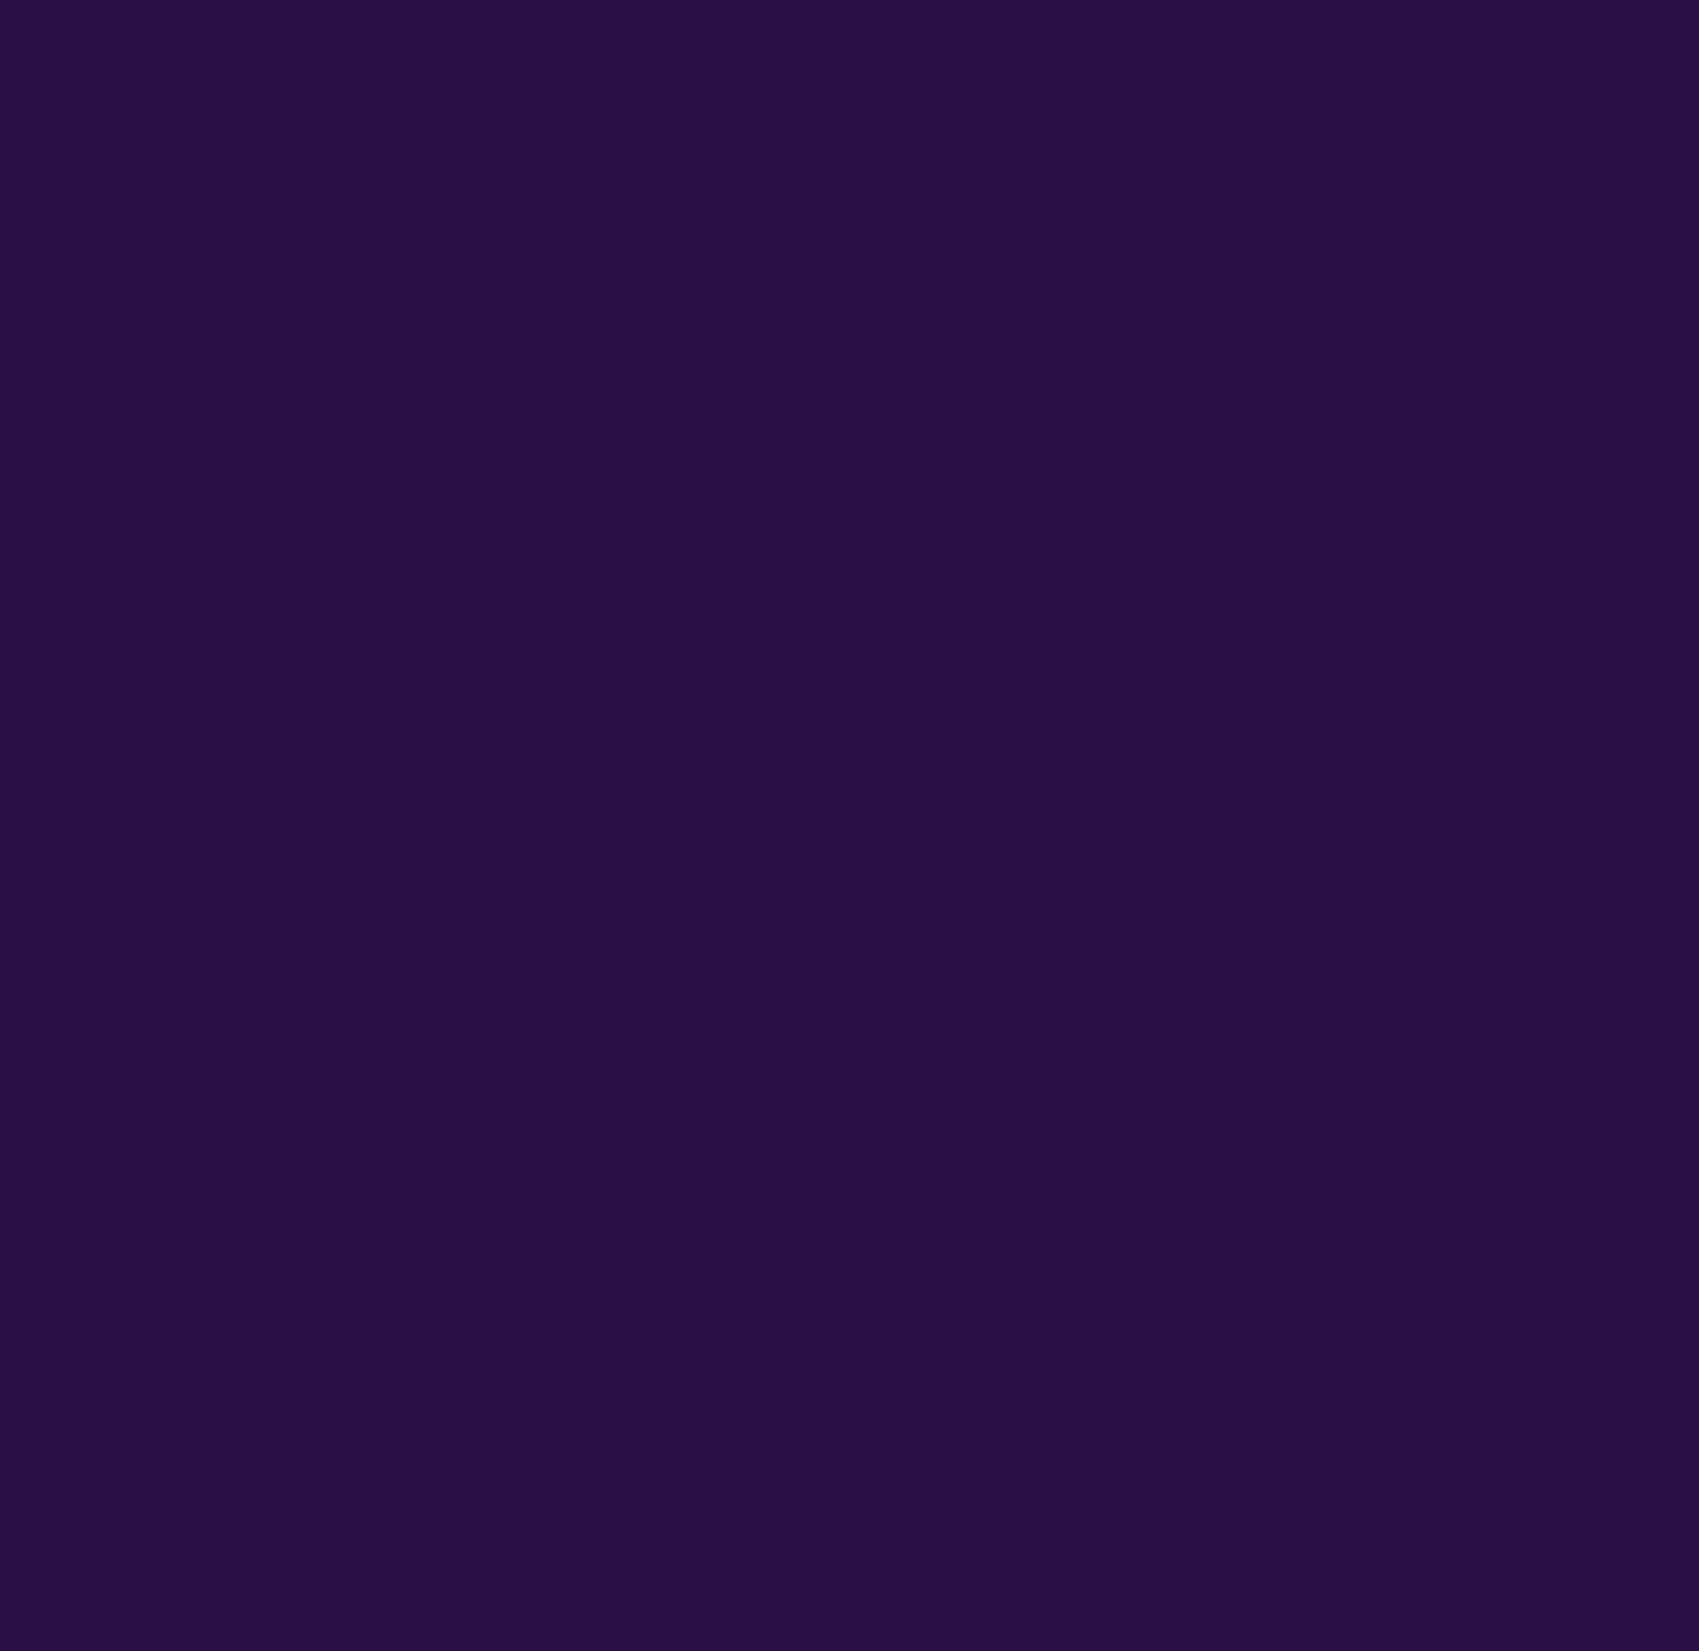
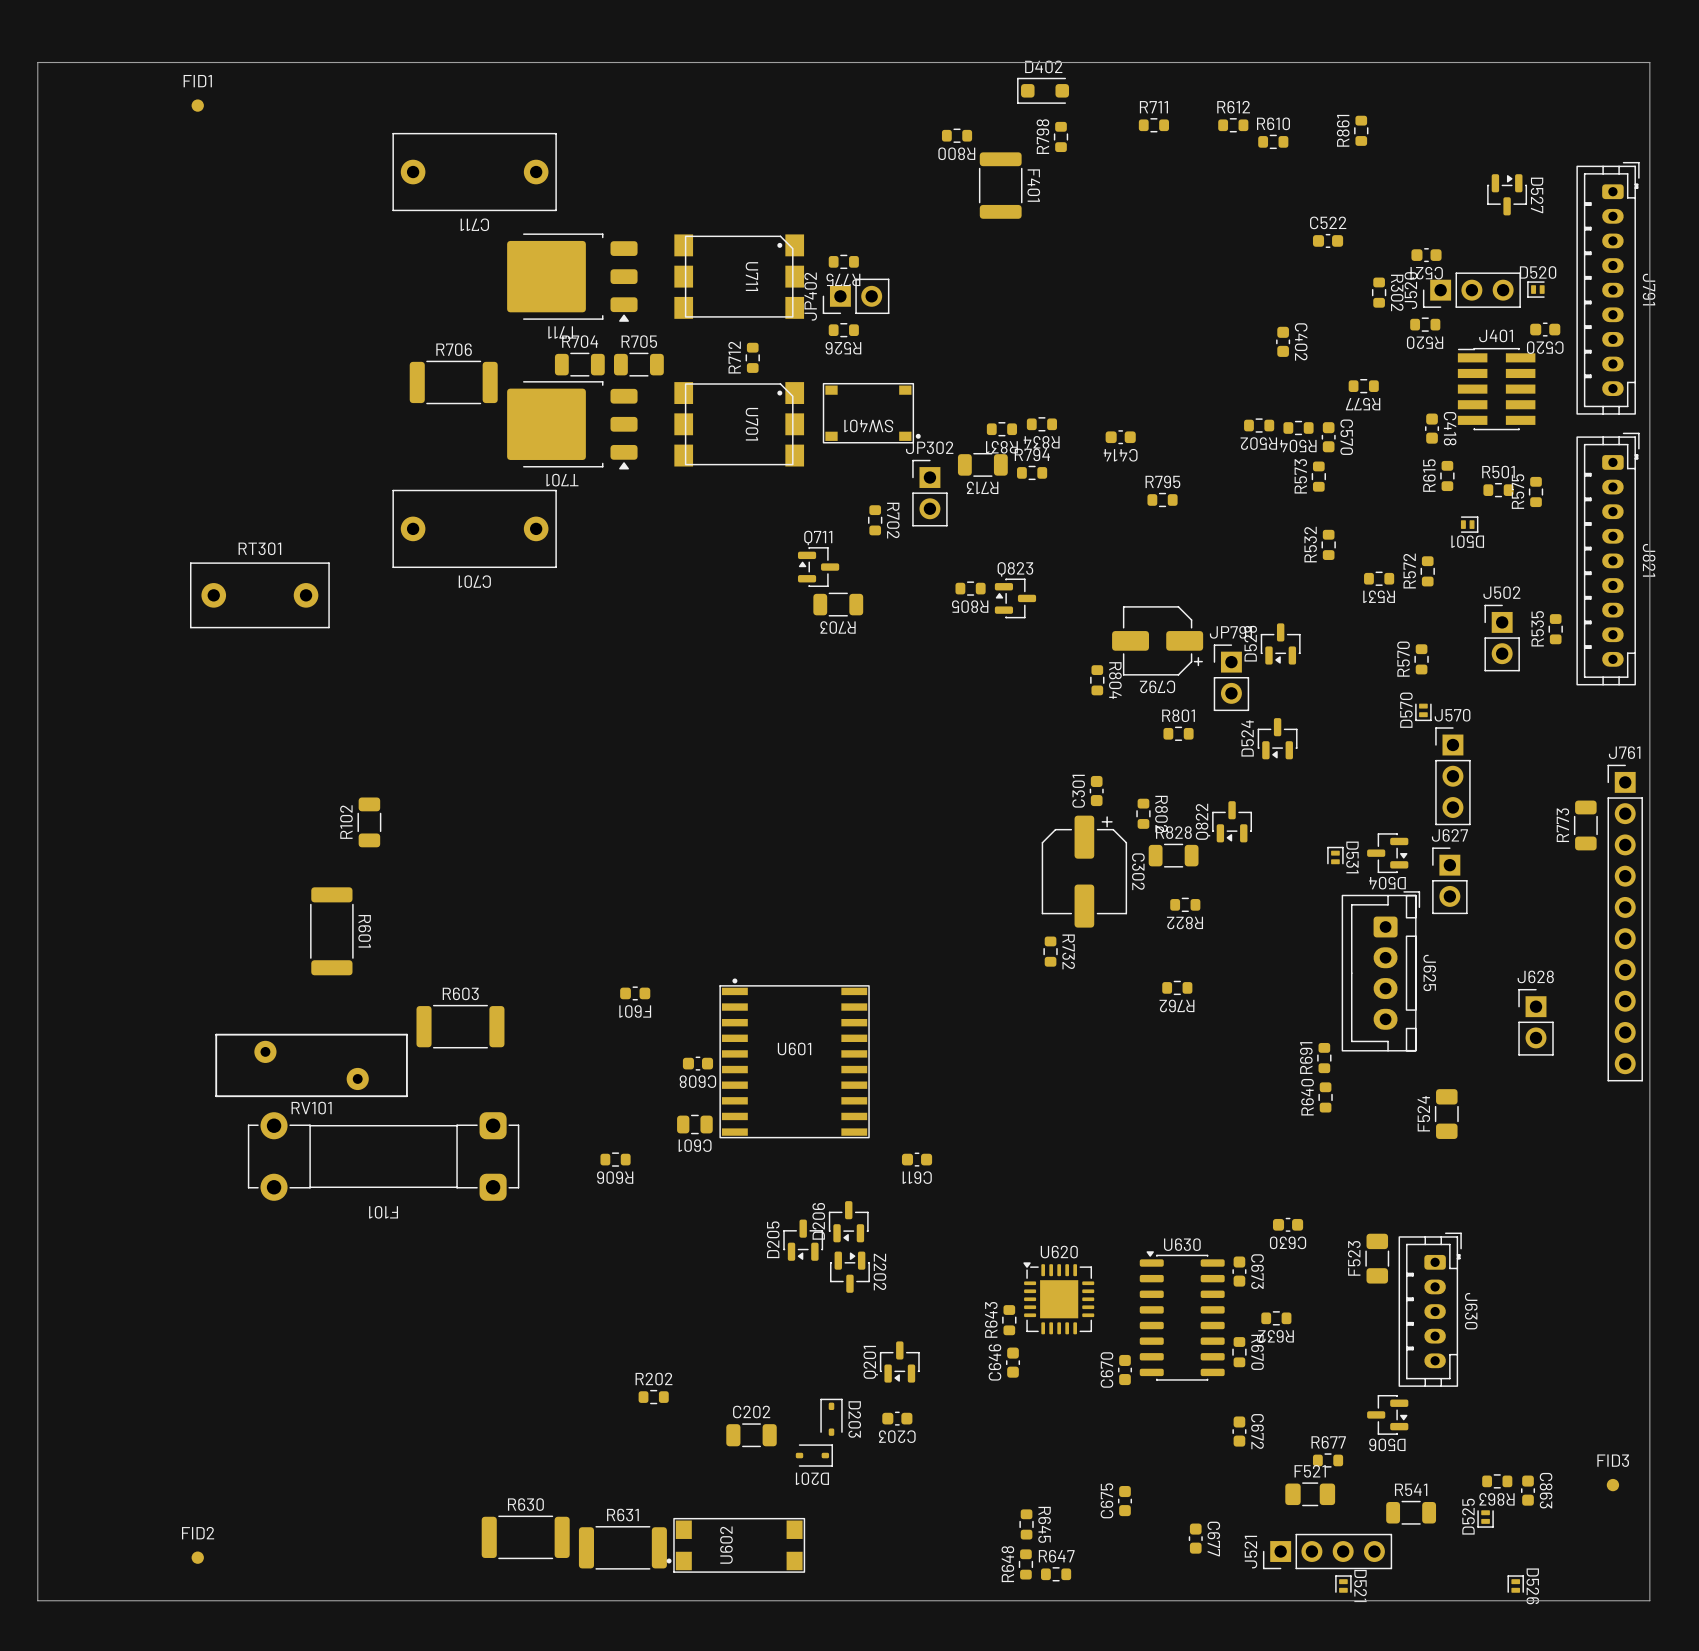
board edge: none -> (37, 62) (1649, 62) (1649, 1600) (37, 1600) (37, 62)
D402: none -> (1043, 90)
FID1: none -> (197, 105)
R711: none -> (1153, 125)
R612: none -> (1233, 125)
R861: none -> (1361, 130)
R800: none -> (957, 135)
R798: none -> (1061, 136)
R610: none -> (1273, 141)
C711: none -> (474, 172)
F401: none -> (1000, 185)
D527: none -> (1507, 194)
C522: none -> (1328, 240)
C521: none -> (1426, 255)
R775: none -> (843, 261)
U711: none -> (739, 276)
T711: none -> (572, 277)
J791: none -> (1608, 288)
D520: none -> (1535, 289)
J520: none -> (1471, 290)
R302: none -> (1379, 292)
JP402: none -> (856, 296)
R520: none -> (1425, 324)
C520: none -> (1545, 329)
R526: none -> (843, 330)
C402: none -> (1283, 341)
R712: none -> (752, 357)
R704: none -> (579, 364)
R705: none -> (638, 364)
R706: none -> (453, 382)
R577: none -> (1363, 386)
J401: none -> (1496, 389)
SW401: none -> (871, 413)
U701: none -> (739, 424)
R834: none -> (1041, 424)
T701: none -> (572, 425)
R502: none -> (1259, 425)
R504: none -> (1298, 427)
C418: none -> (1432, 428)
R831: none -> (1001, 429)
C414: none -> (1120, 437)
C570: none -> (1328, 437)
R713: none -> (982, 464)
R794: none -> (1032, 472)
R615: none -> (1447, 475)
R573: none -> (1318, 476)
R501: none -> (1498, 490)
R575: none -> (1536, 491)
JP302: none -> (929, 493)
R795: none -> (1162, 499)
R702: none -> (875, 520)
D501: none -> (1469, 524)
C701: none -> (474, 528)
R532: none -> (1328, 544)
J821: none -> (1608, 559)
Q711: none -> (818, 567)
R572: none -> (1427, 571)
R531: none -> (1379, 578)
R805: none -> (970, 588)
RT301: none -> (259, 595)
Q823: none -> (1015, 598)
R703: none -> (838, 604)
R535: none -> (1555, 629)
J502: none -> (1502, 638)
C792: none -> (1157, 640)
D528: none -> (1280, 643)
R570: none -> (1421, 659)
JP791: none -> (1231, 677)
R804: none -> (1097, 680)
D570: none -> (1423, 712)
R801: none -> (1178, 733)
D524: none -> (1277, 738)
J570: none -> (1452, 776)
C301: none -> (1096, 791)
R802: none -> (1143, 813)
Q822: none -> (1232, 821)
R102: none -> (369, 822)
R773: none -> (1585, 825)
D504: none -> (1387, 853)
R828: none -> (1173, 855)
D531: none -> (1335, 855)
C302: none -> (1084, 871)
J627: none -> (1449, 880)
R822: none -> (1185, 904)
J761: none -> (1625, 923)
R601: none -> (331, 931)
R732: none -> (1050, 951)
J625: none -> (1380, 971)
R762: none -> (1177, 987)
F601: none -> (635, 993)
J628: none -> (1536, 1022)
R603: none -> (460, 1026)
U601: none -> (794, 1058)
R691: none -> (1324, 1058)
C608: none -> (697, 1063)
RV101: none -> (311, 1065)
R640: none -> (1325, 1097)
F524: none -> (1446, 1114)
C601: none -> (694, 1124)
F101: none -> (383, 1156)
R606: none -> (615, 1159)
C611: none -> (917, 1159)
D206: none -> (848, 1221)
C630: none -> (1288, 1224)
D205: none -> (803, 1240)
F523: none -> (1377, 1258)
C673: none -> (1239, 1271)
Z202: none -> (849, 1272)
U620: none -> (1058, 1298)
J630: none -> (1430, 1309)
U630: none -> (1182, 1315)
R632: none -> (1276, 1318)
R643: none -> (1009, 1320)
R670: none -> (1239, 1352)
Q201: none -> (899, 1362)
C646: none -> (1013, 1362)
C670: none -> (1125, 1370)
R202: none -> (653, 1397)
D506: none -> (1387, 1414)
D203: none -> (831, 1417)
C203: none -> (897, 1418)
C672: none -> (1239, 1431)
C202: none -> (751, 1435)
D201: none -> (814, 1455)
R677: none -> (1328, 1460)
R863: none -> (1497, 1481)
FID3: none -> (1612, 1485)
C863: none -> (1528, 1490)
F521: none -> (1310, 1494)
C675: none -> (1125, 1501)
R541: none -> (1411, 1512)
D525: none -> (1485, 1518)
R645: none -> (1026, 1524)
R630: none -> (525, 1537)
C677: none -> (1195, 1538)
U602: none -> (735, 1545)
R631: none -> (622, 1547)
J521: none -> (1327, 1551)
FID2: none -> (197, 1557)
R648: none -> (1025, 1564)
R647: none -> (1056, 1574)
D521: none -> (1343, 1584)
D526: none -> (1515, 1584)

